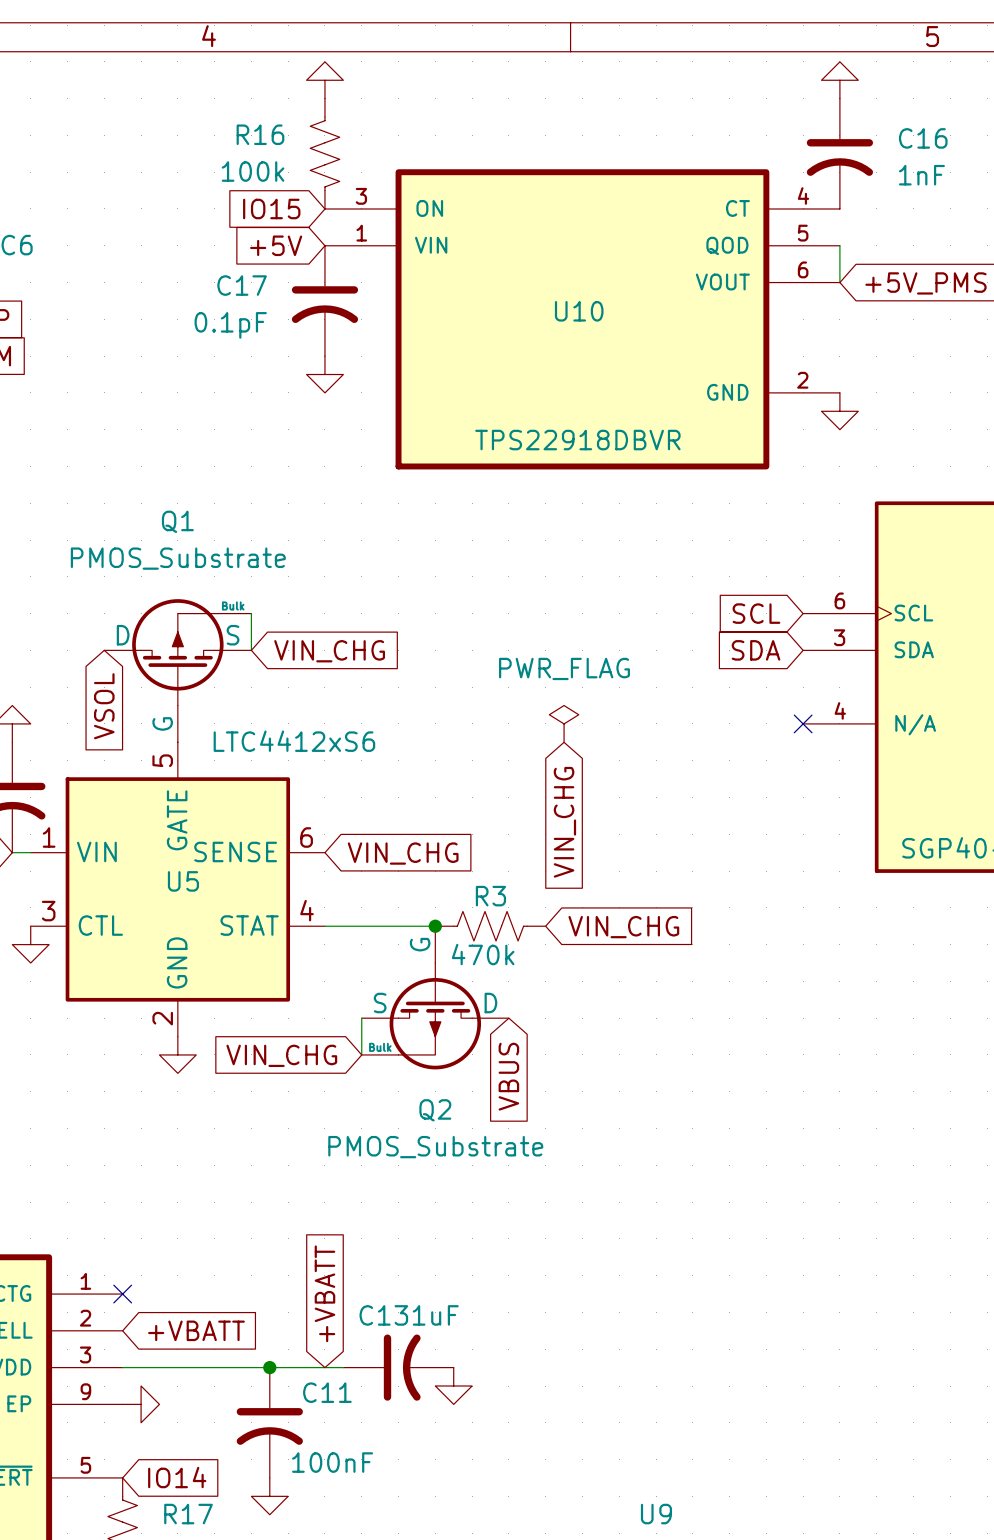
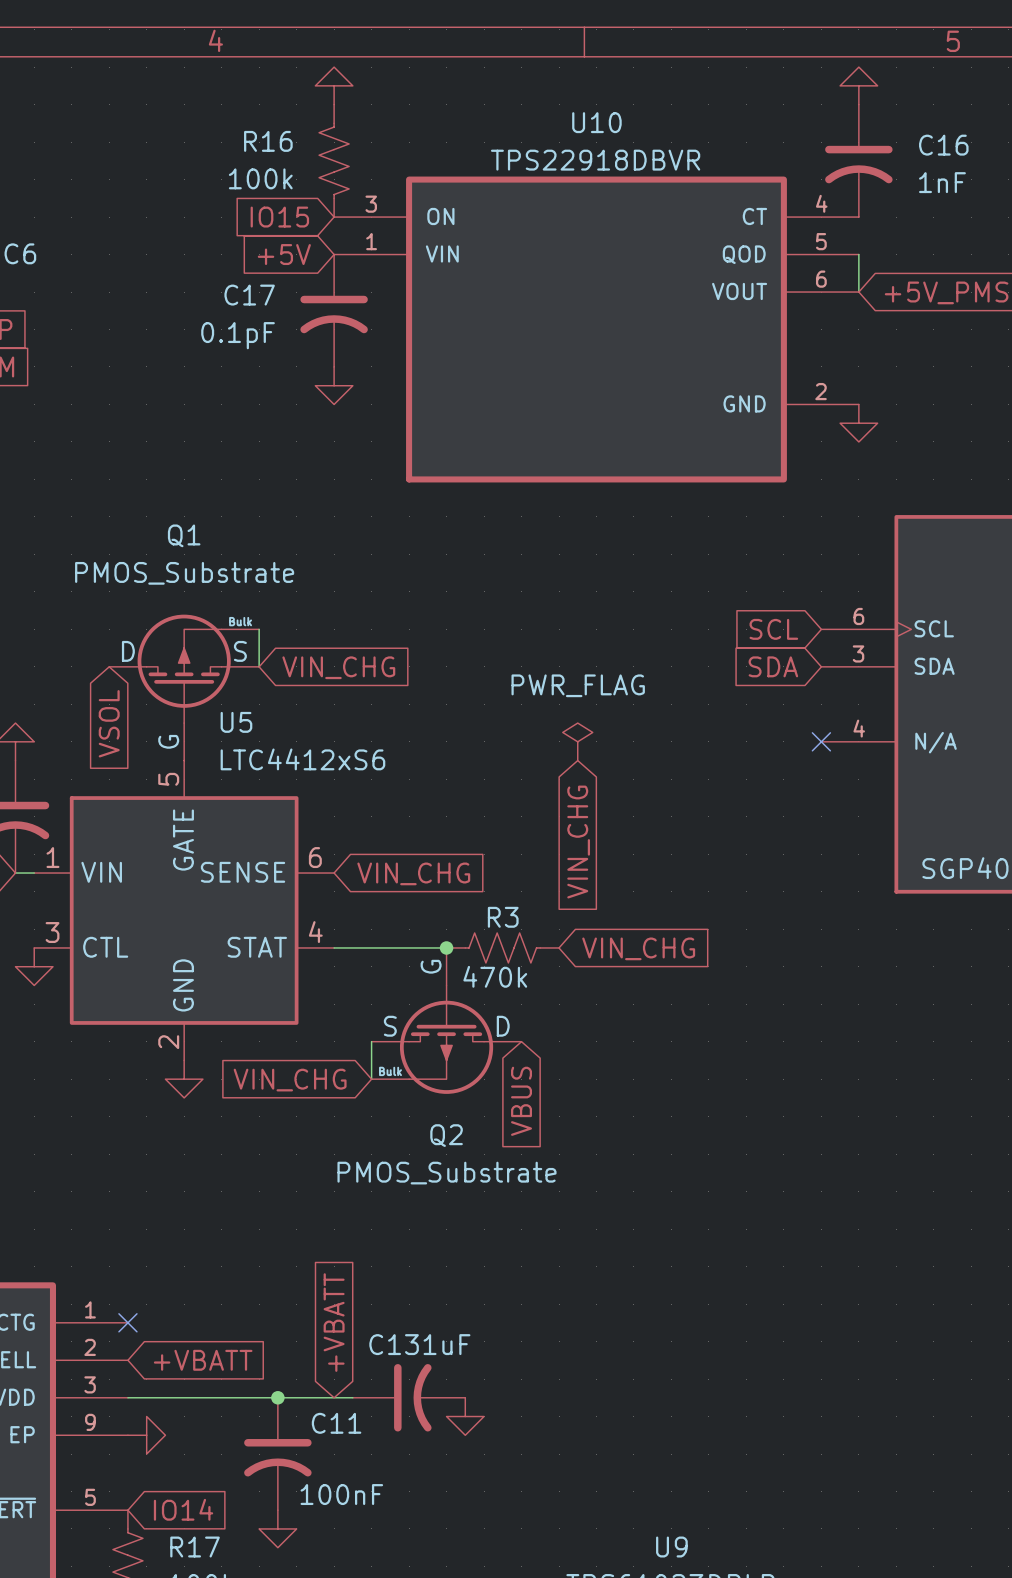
U10 name position: U10 (579, 311) -> U10 (596, 122)
U10 value position: TPS22918DBVR (577, 440) -> TPS22918DBVR (595, 160)
U5 name position: U5 (183, 881) -> U5 (236, 722)

